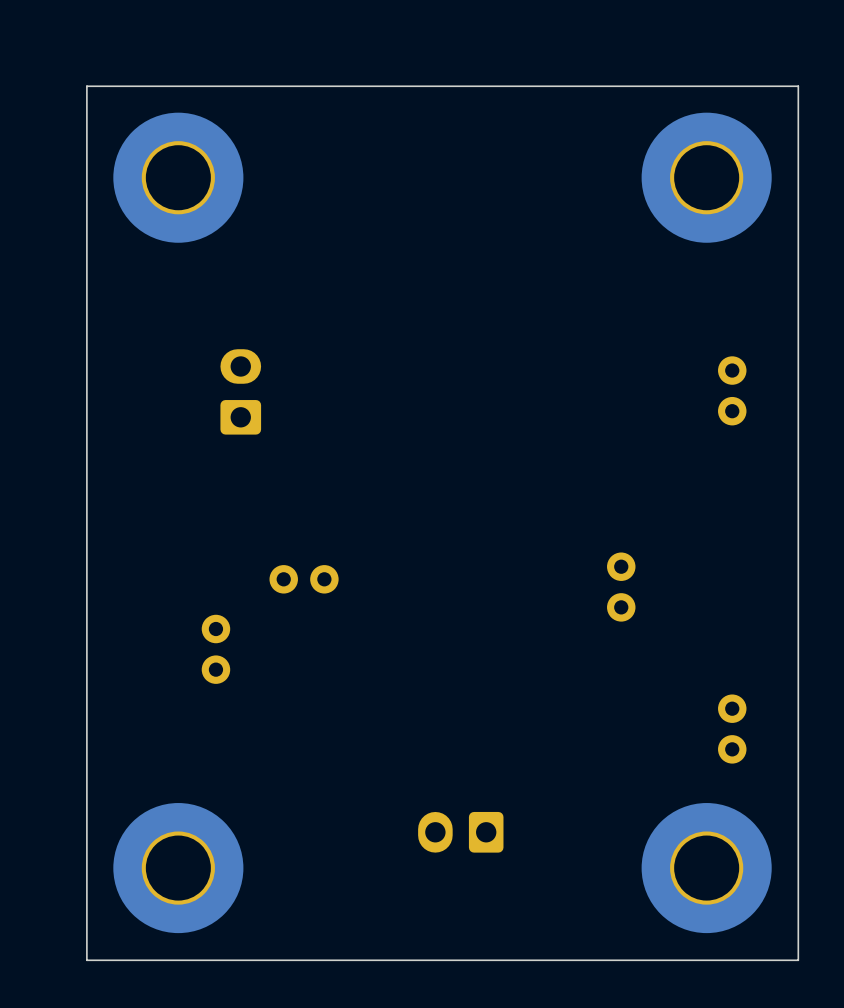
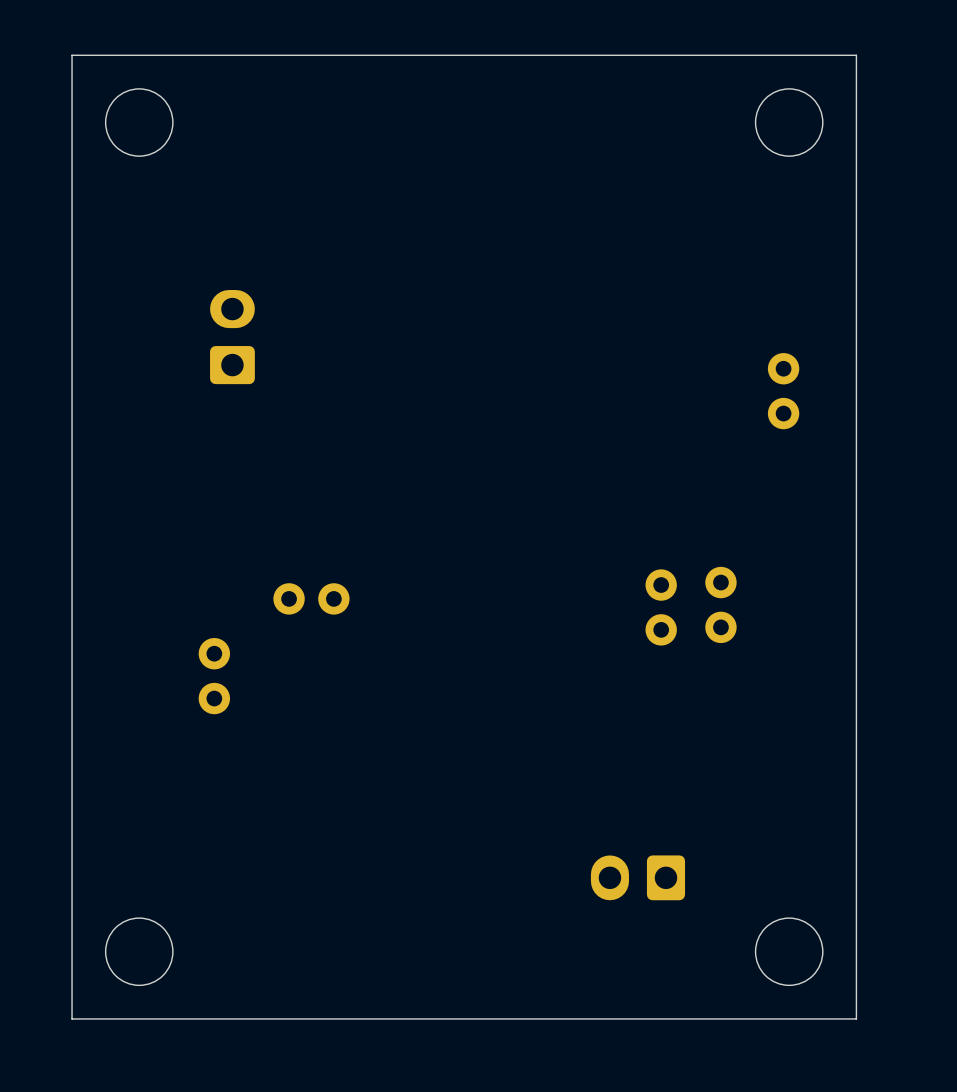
round board edge: none -> [105, 88, 174, 157]
round board edge: none -> [755, 88, 824, 157]
part: (178, 177) -> none
part: (706, 177) -> none
part position: (240, 391) -> (232, 337)
part position: (732, 729) -> (720, 604)
part position: (460, 832) -> (637, 877)
round board edge: none -> [105, 917, 174, 986]
part: (178, 868) -> none
part: (706, 868) -> none
round board edge: none -> [755, 917, 824, 986]

